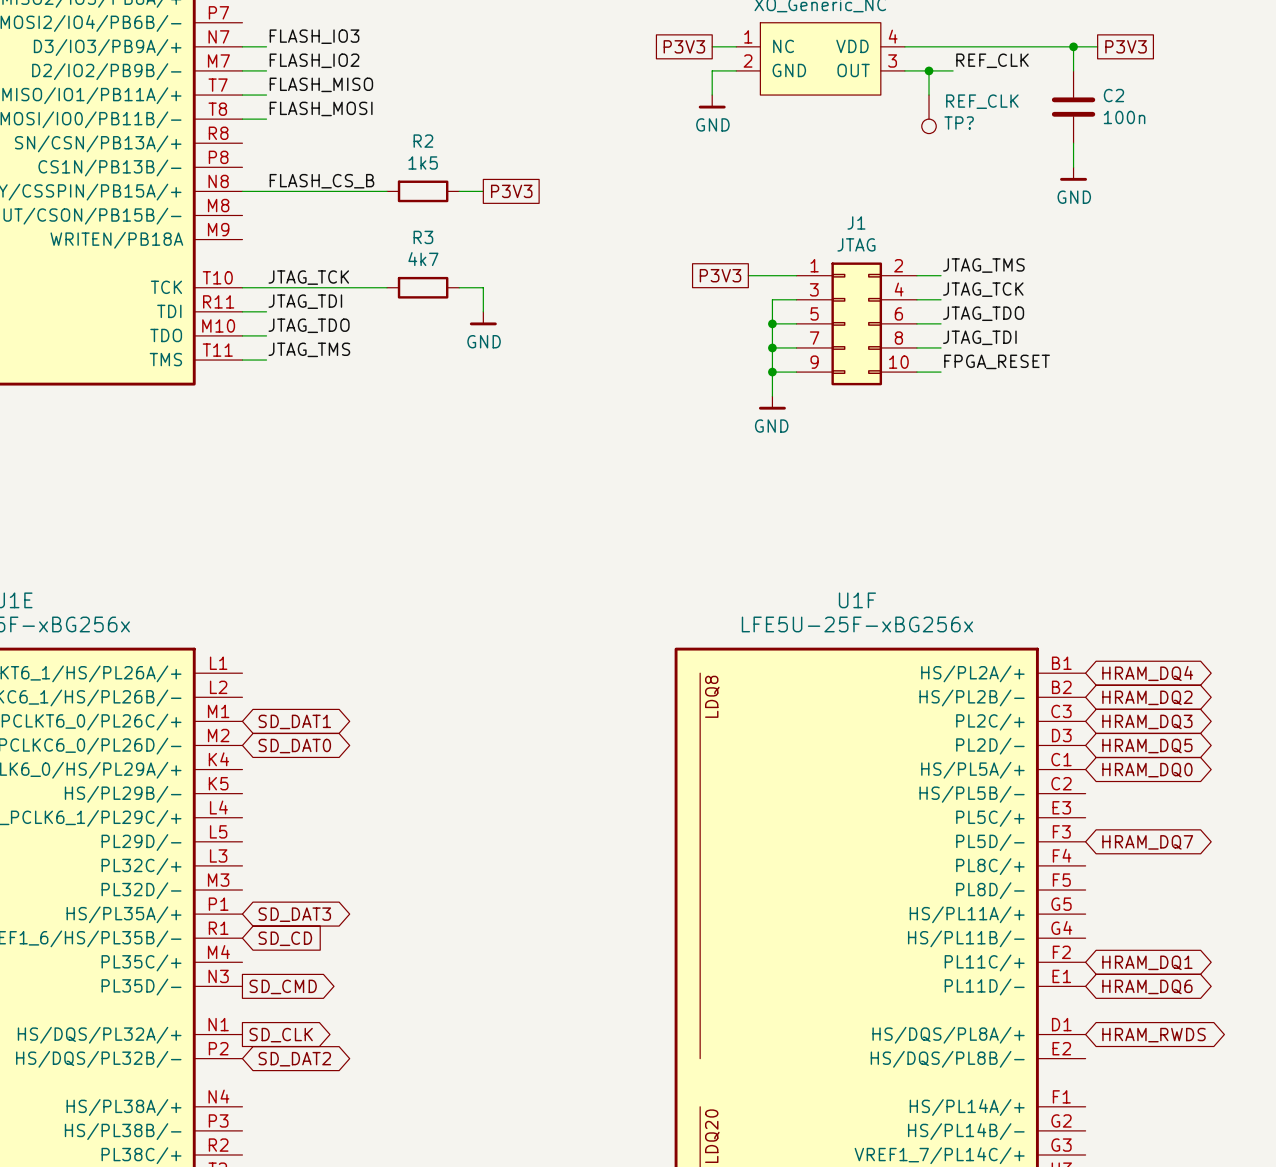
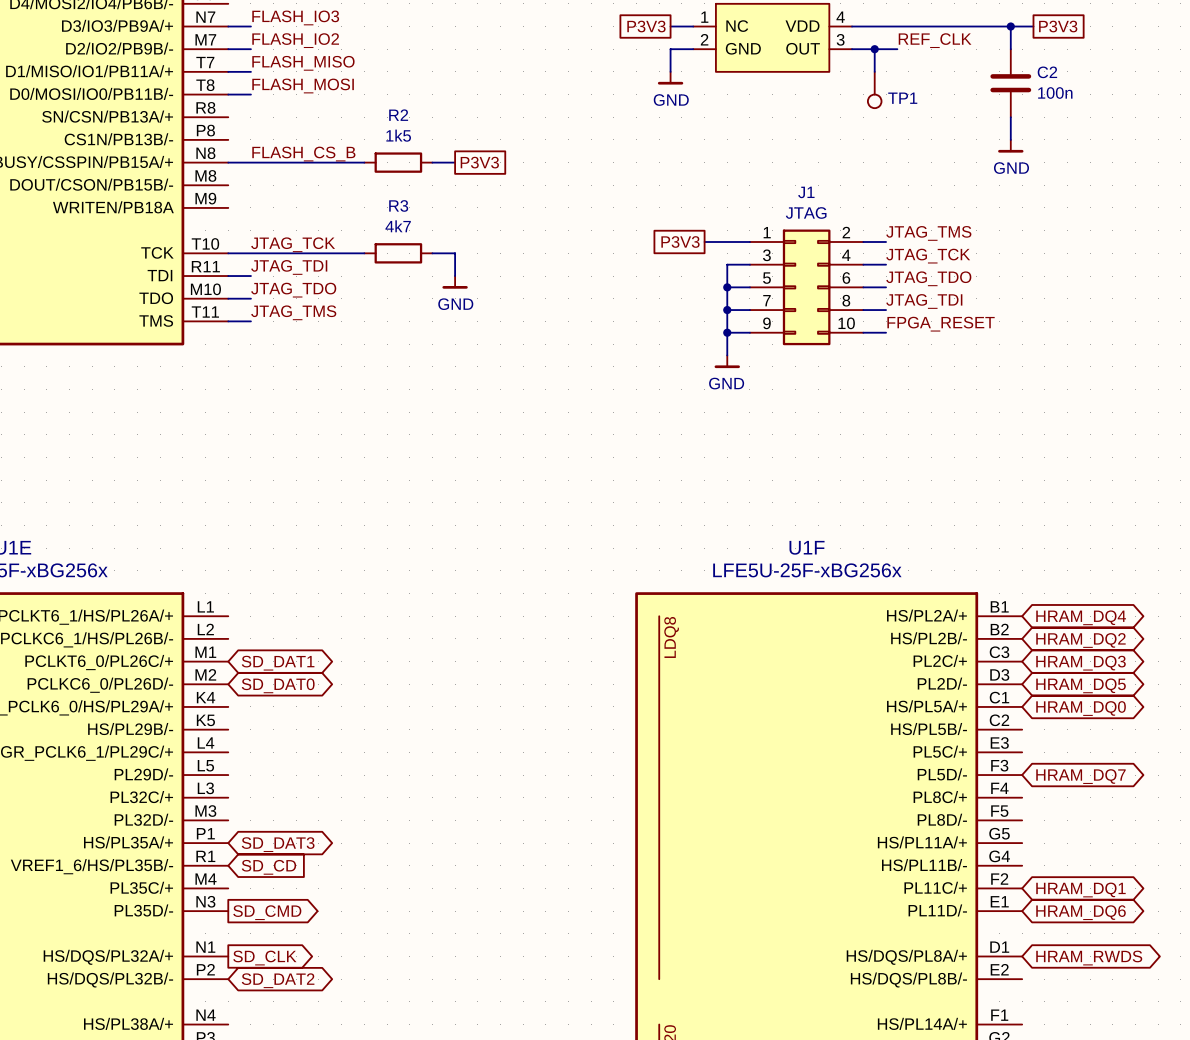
TP? value: REF_CLK (982, 101) -> none
TP? name: TP? (959, 123) -> TP1 (902, 98)

